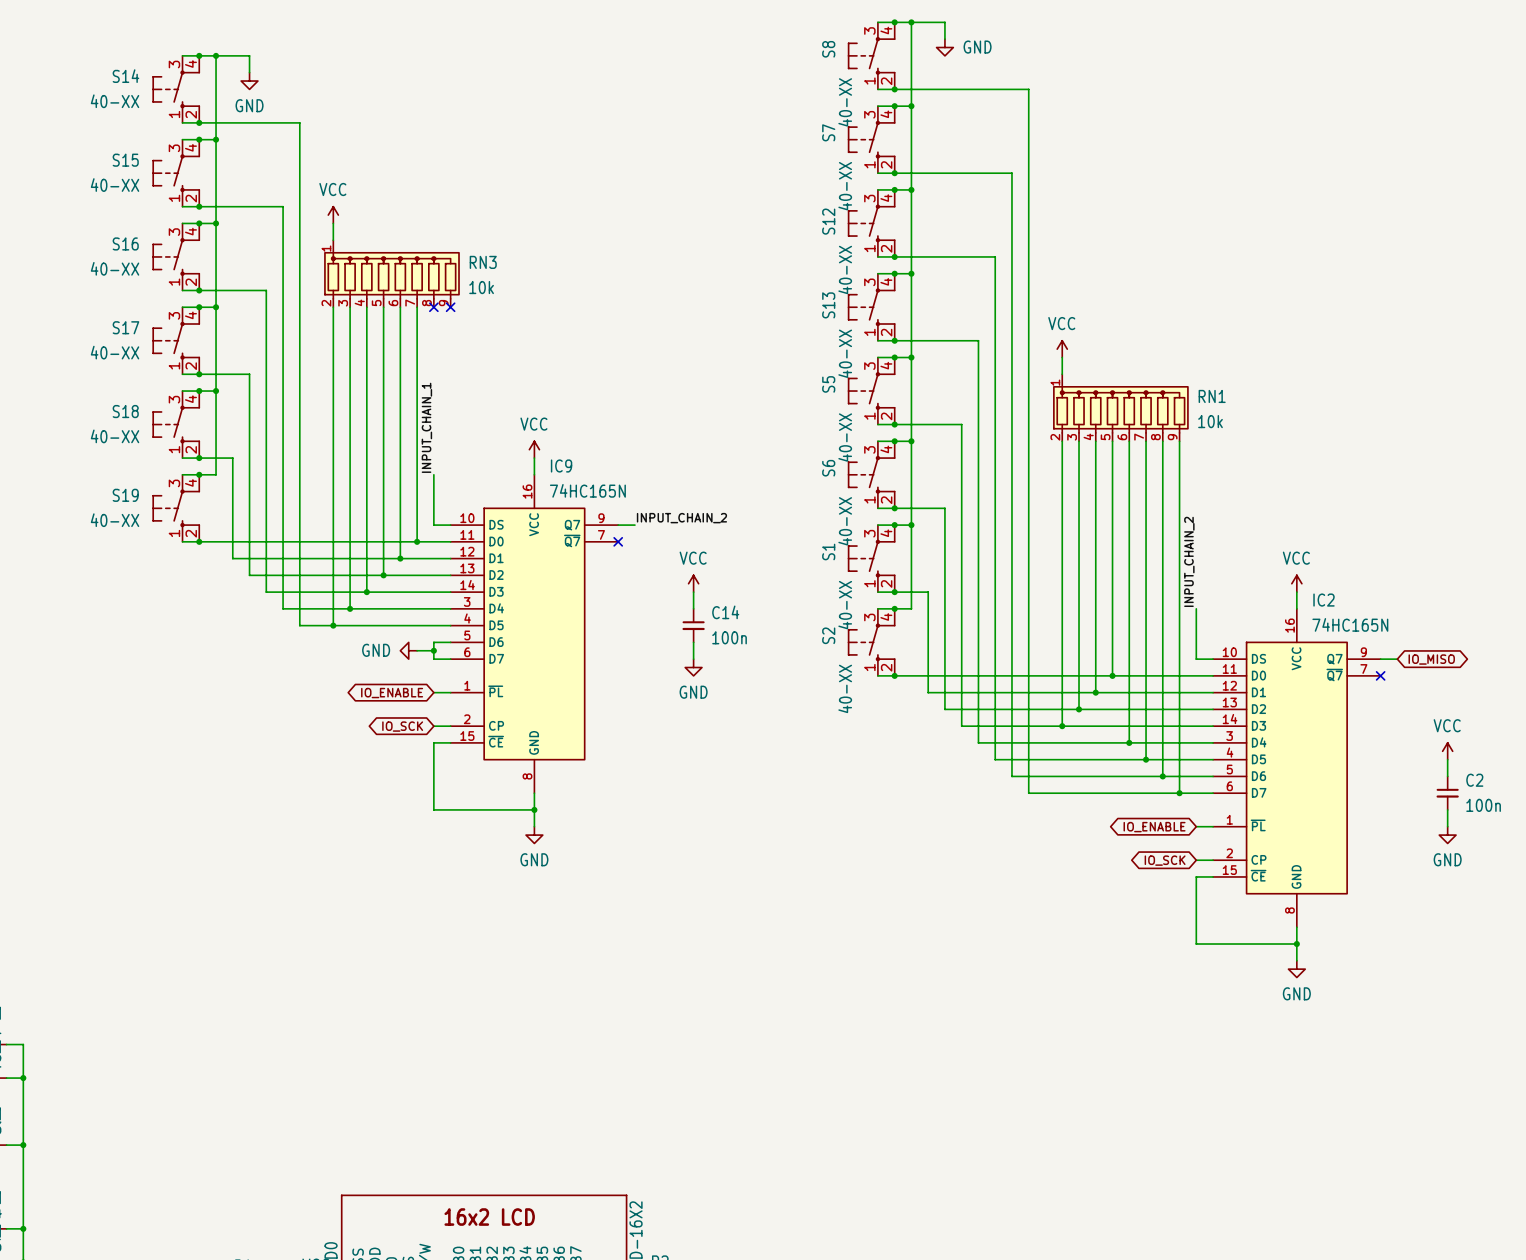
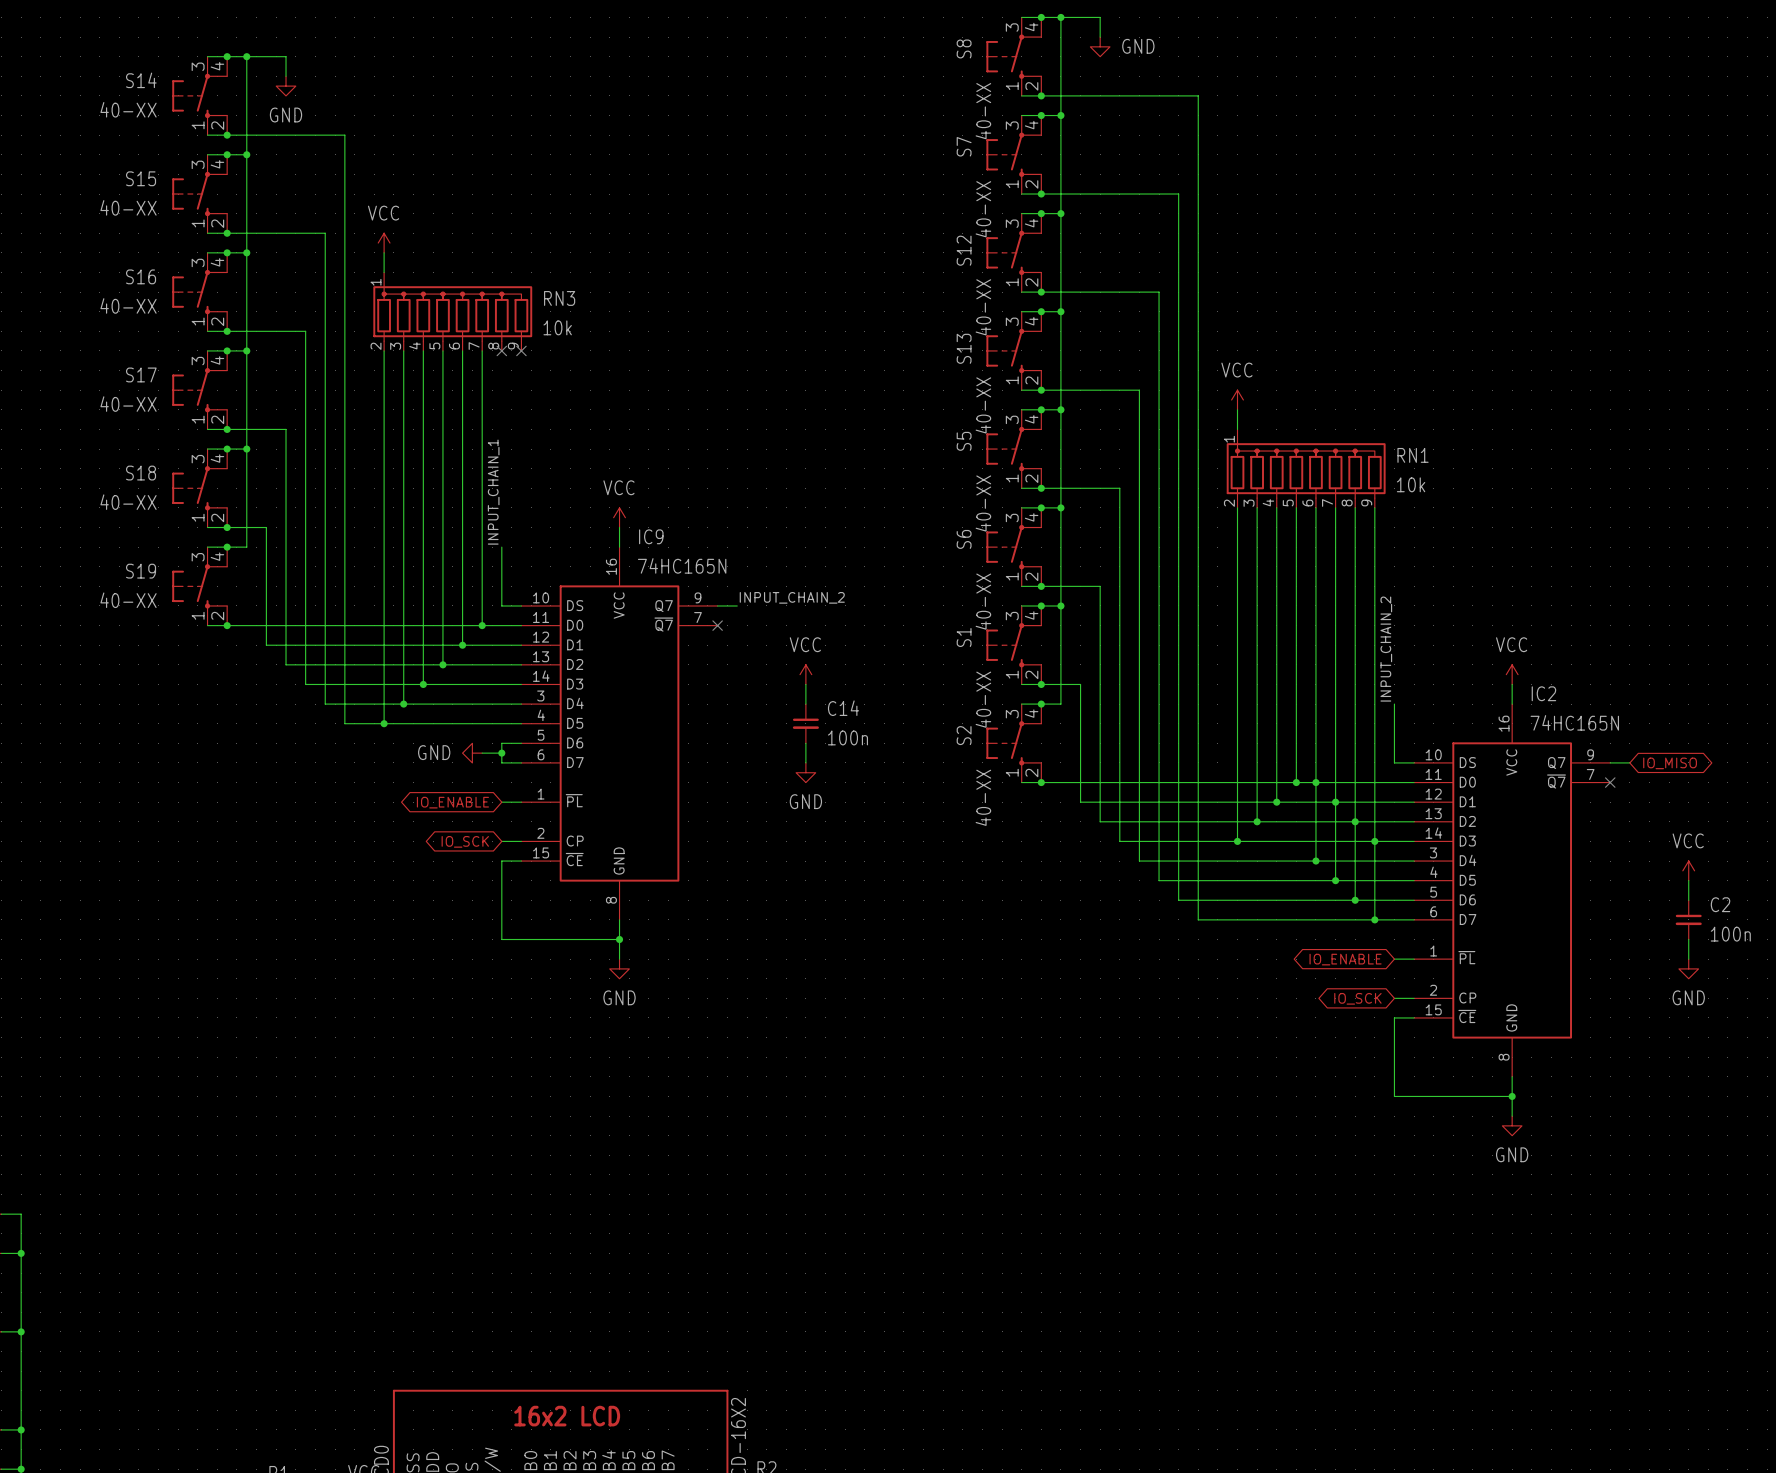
junction: none -> (1315, 782)
junction: none -> (1335, 802)
junction: none -> (1355, 821)
junction: none -> (1374, 841)

